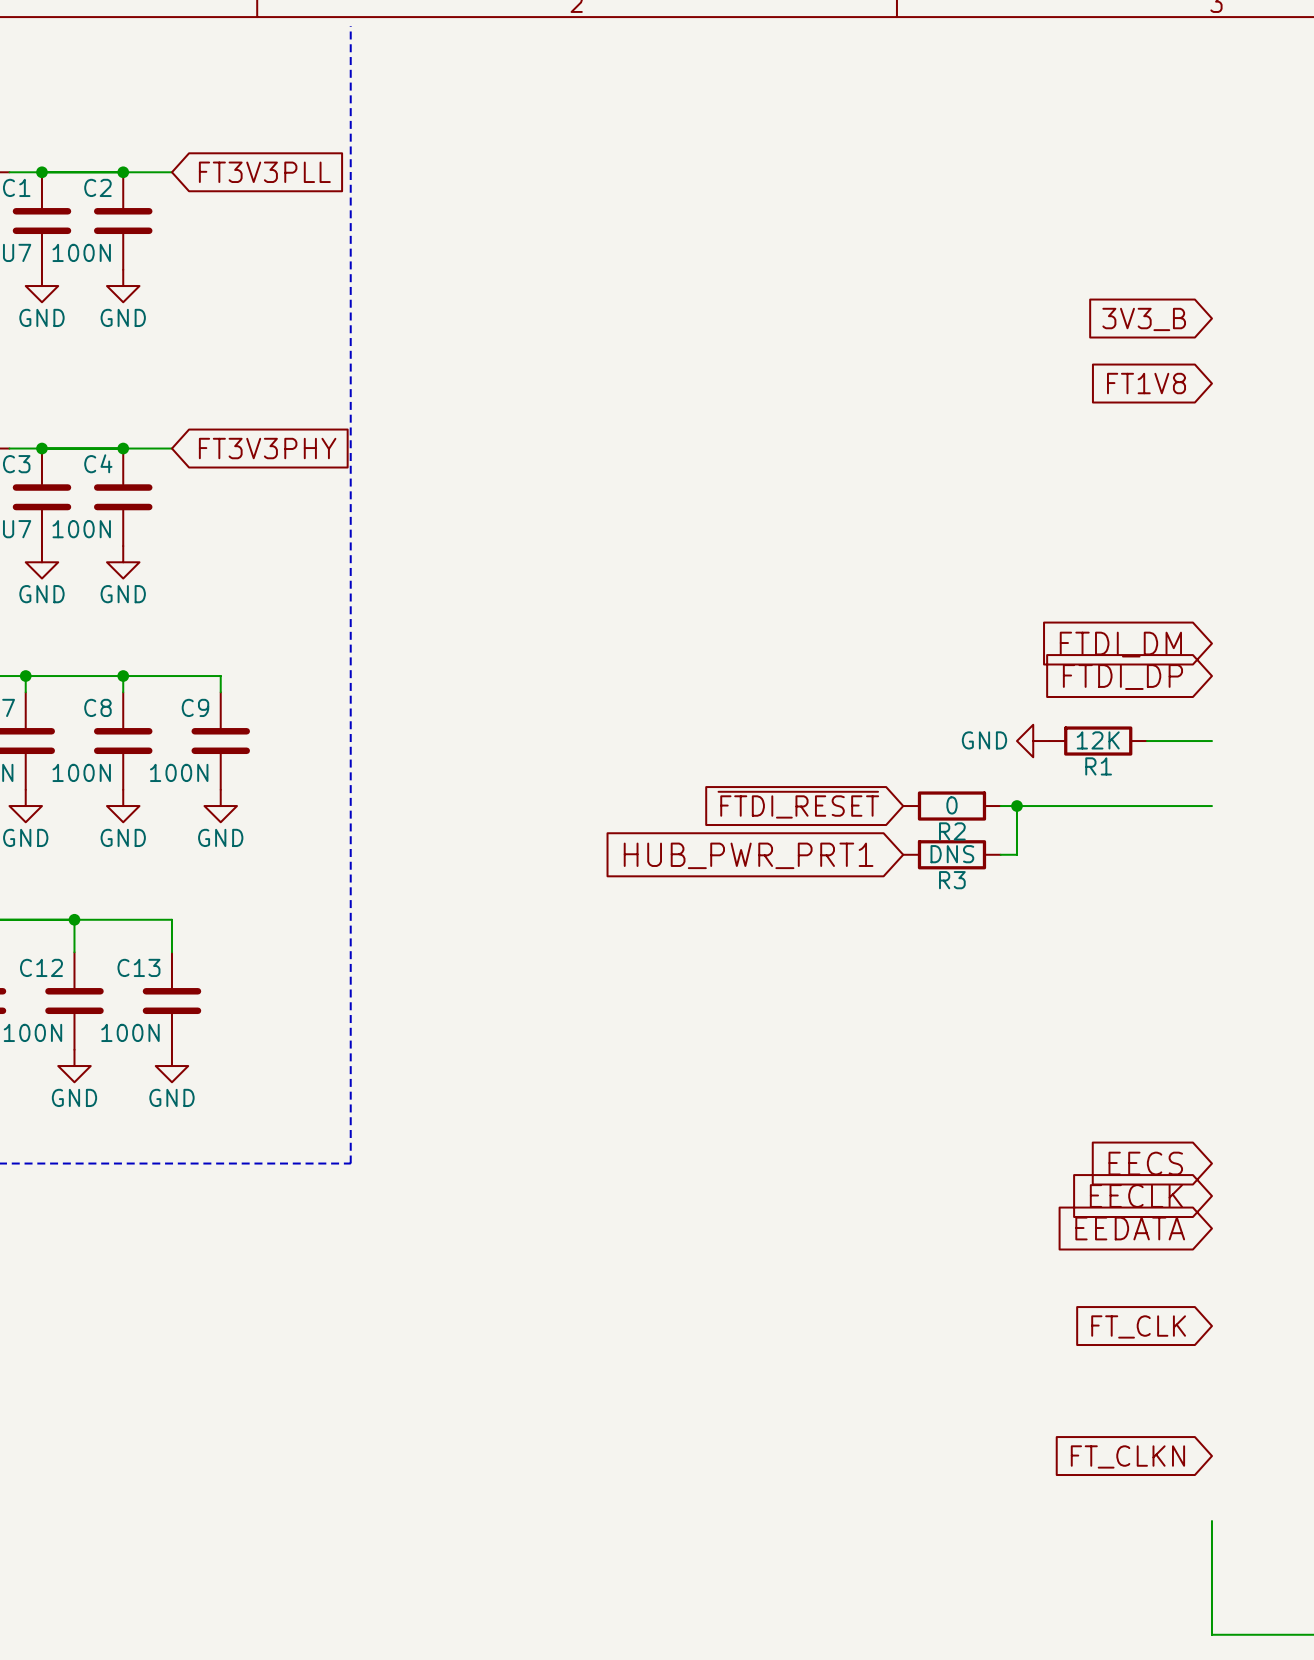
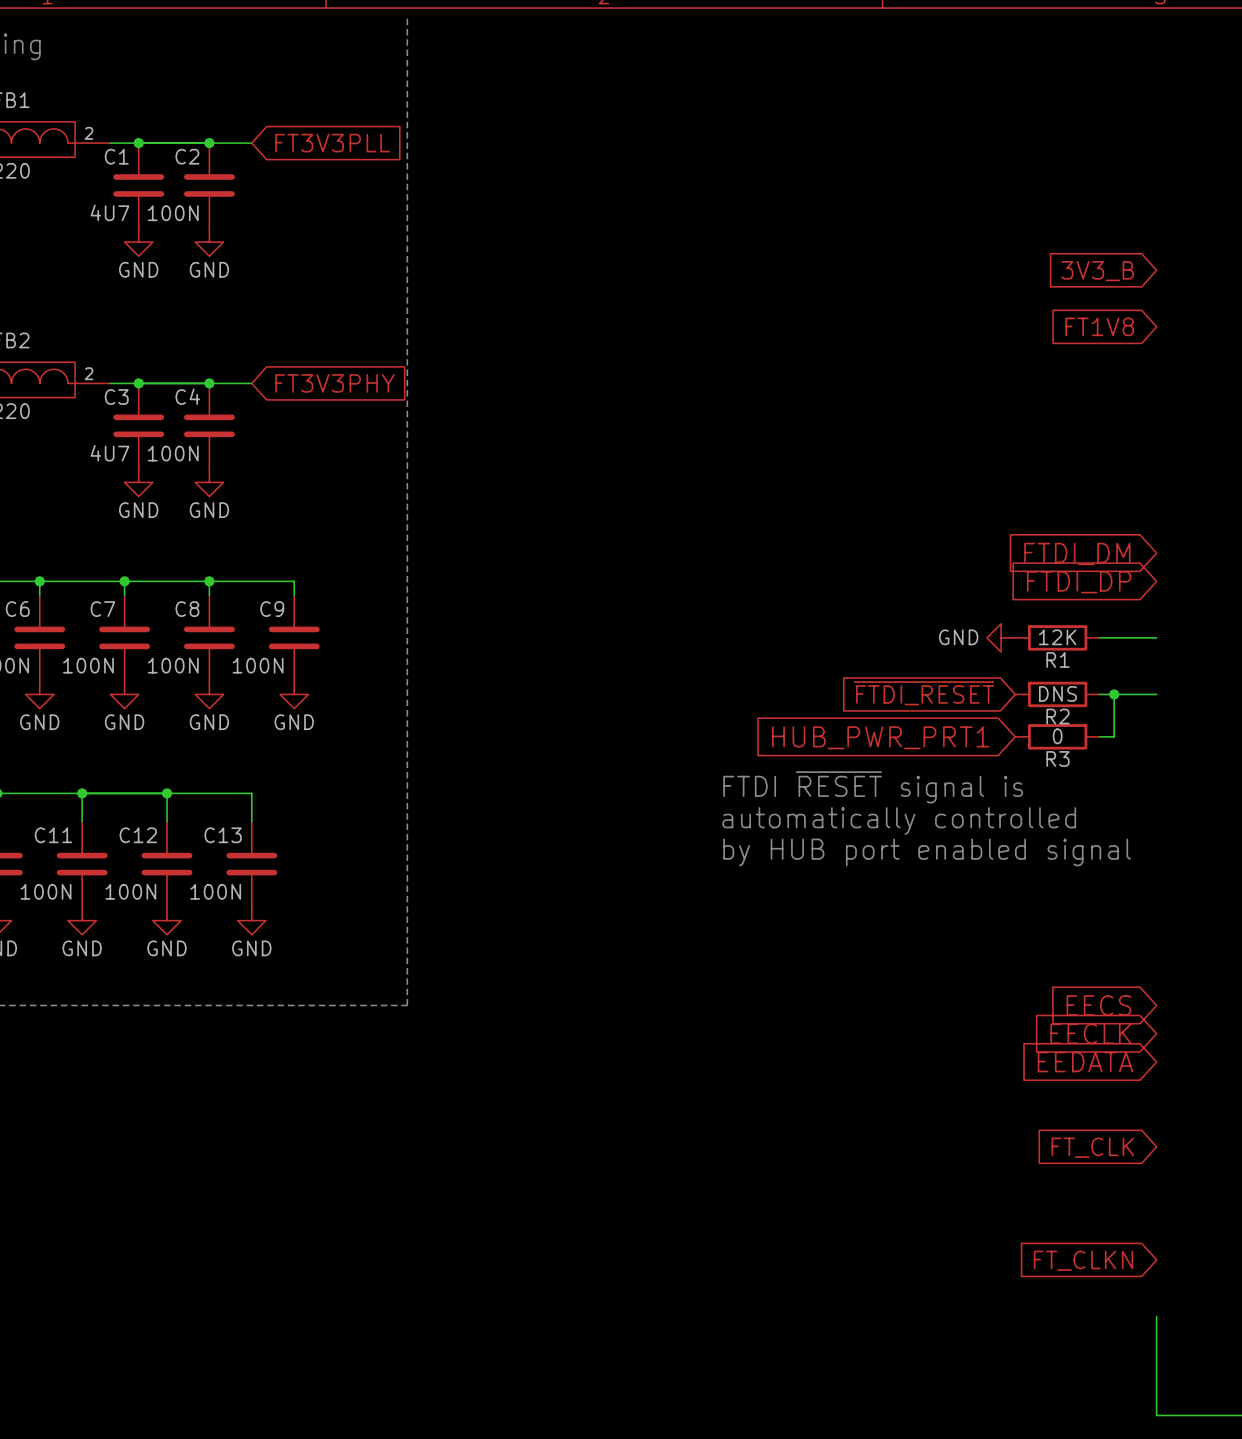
global label position: ~{FTDI_RESET} (798, 804) -> ~{FTDI_RESET} (923, 693)
R2 value: 0 (951, 805) -> DNS (1057, 693)
R2 position: (951, 806) -> (1057, 694)
wire: (1000, 806) (1146, 806) -> none
wire: (1016, 806) (1016, 854) (1000, 854) -> (1114, 694) (1114, 736) (1100, 736)
junction: (1016, 806) -> none
junction: none -> (1114, 694)
R3 position: (951, 854) -> (1057, 736)
R3 value: DNS (952, 854) -> 0 (1057, 736)
global label position: HUB_PWR_PRT1 (748, 855) -> HUB_PWR_PRT1 (880, 737)
text: none -> FTDI ~{RESET} signal is (873, 787)
text: none -> automatically controlled (899, 821)
text: none -> by HUB port enabled signal (927, 852)

